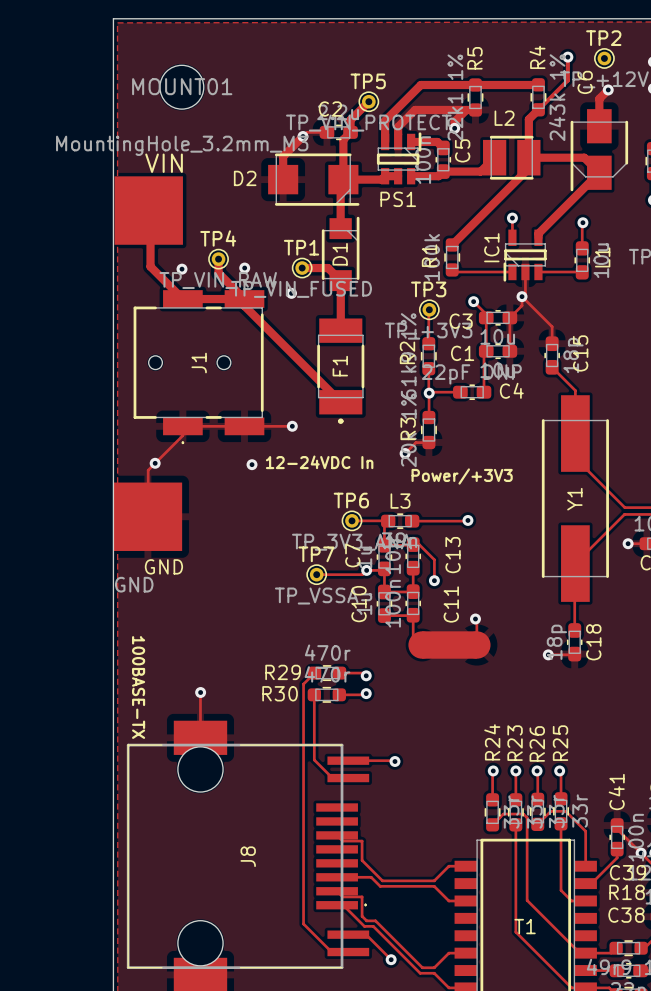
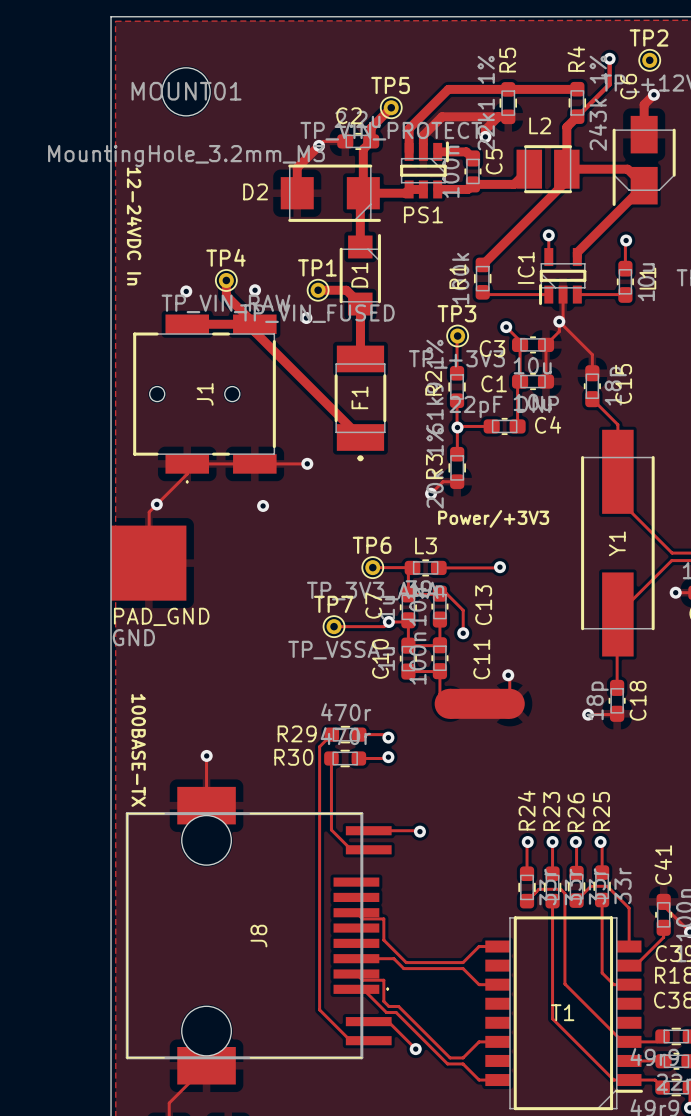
text: none -> 12-24VDC In (134, 226)
track: (148, 210) (150, 212) (150, 266) (182, 299) -> none
VIN: (148, 210) -> none
text: 12-24VDC In (319, 462) -> none
GND name: GND (163, 566) -> PAD_GND (161, 616)

